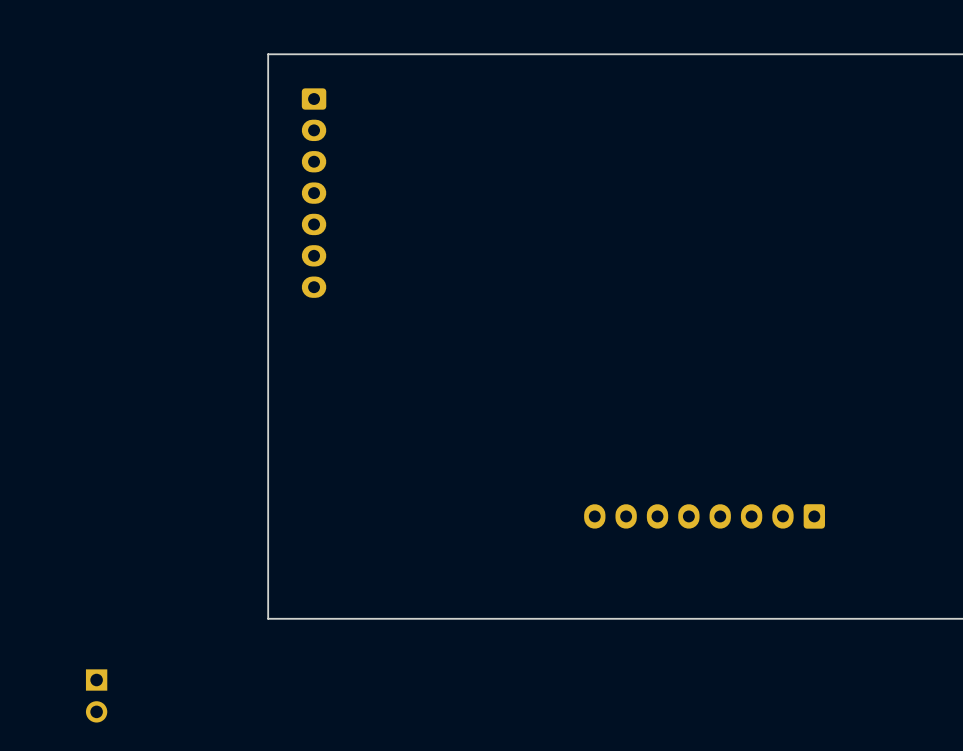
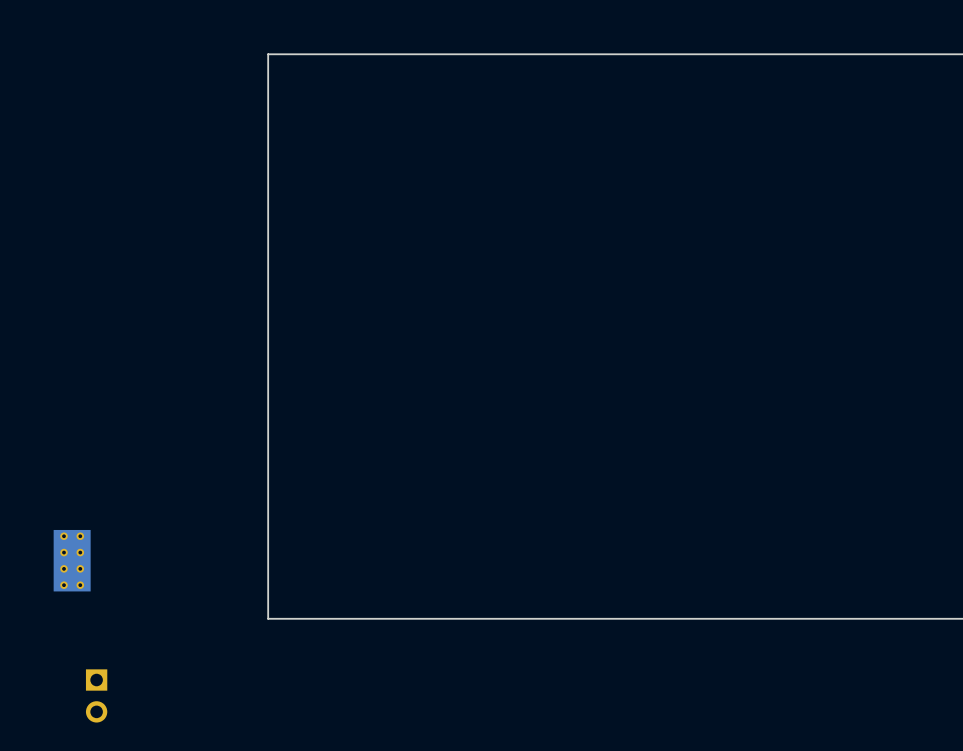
part: (314, 193) -> none
part: (704, 516) -> none
part: none -> (72, 560)

